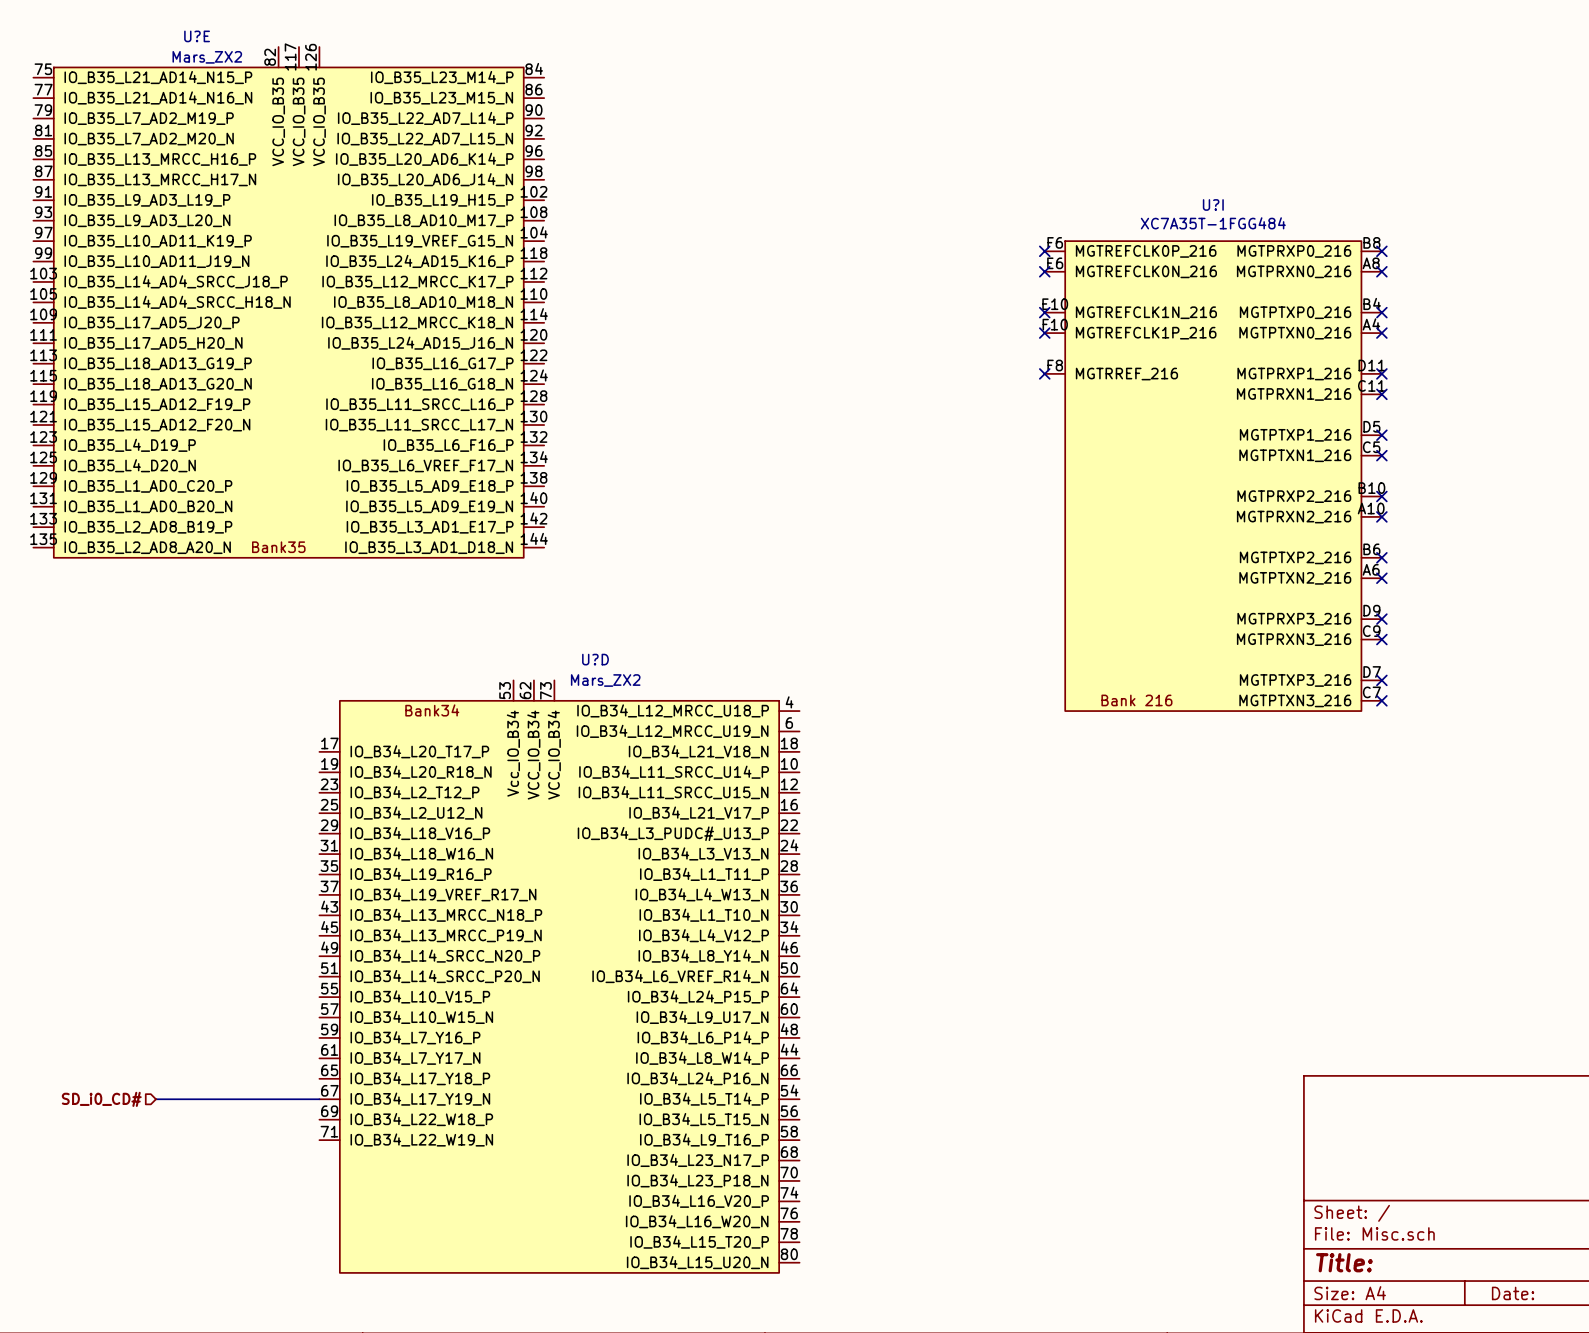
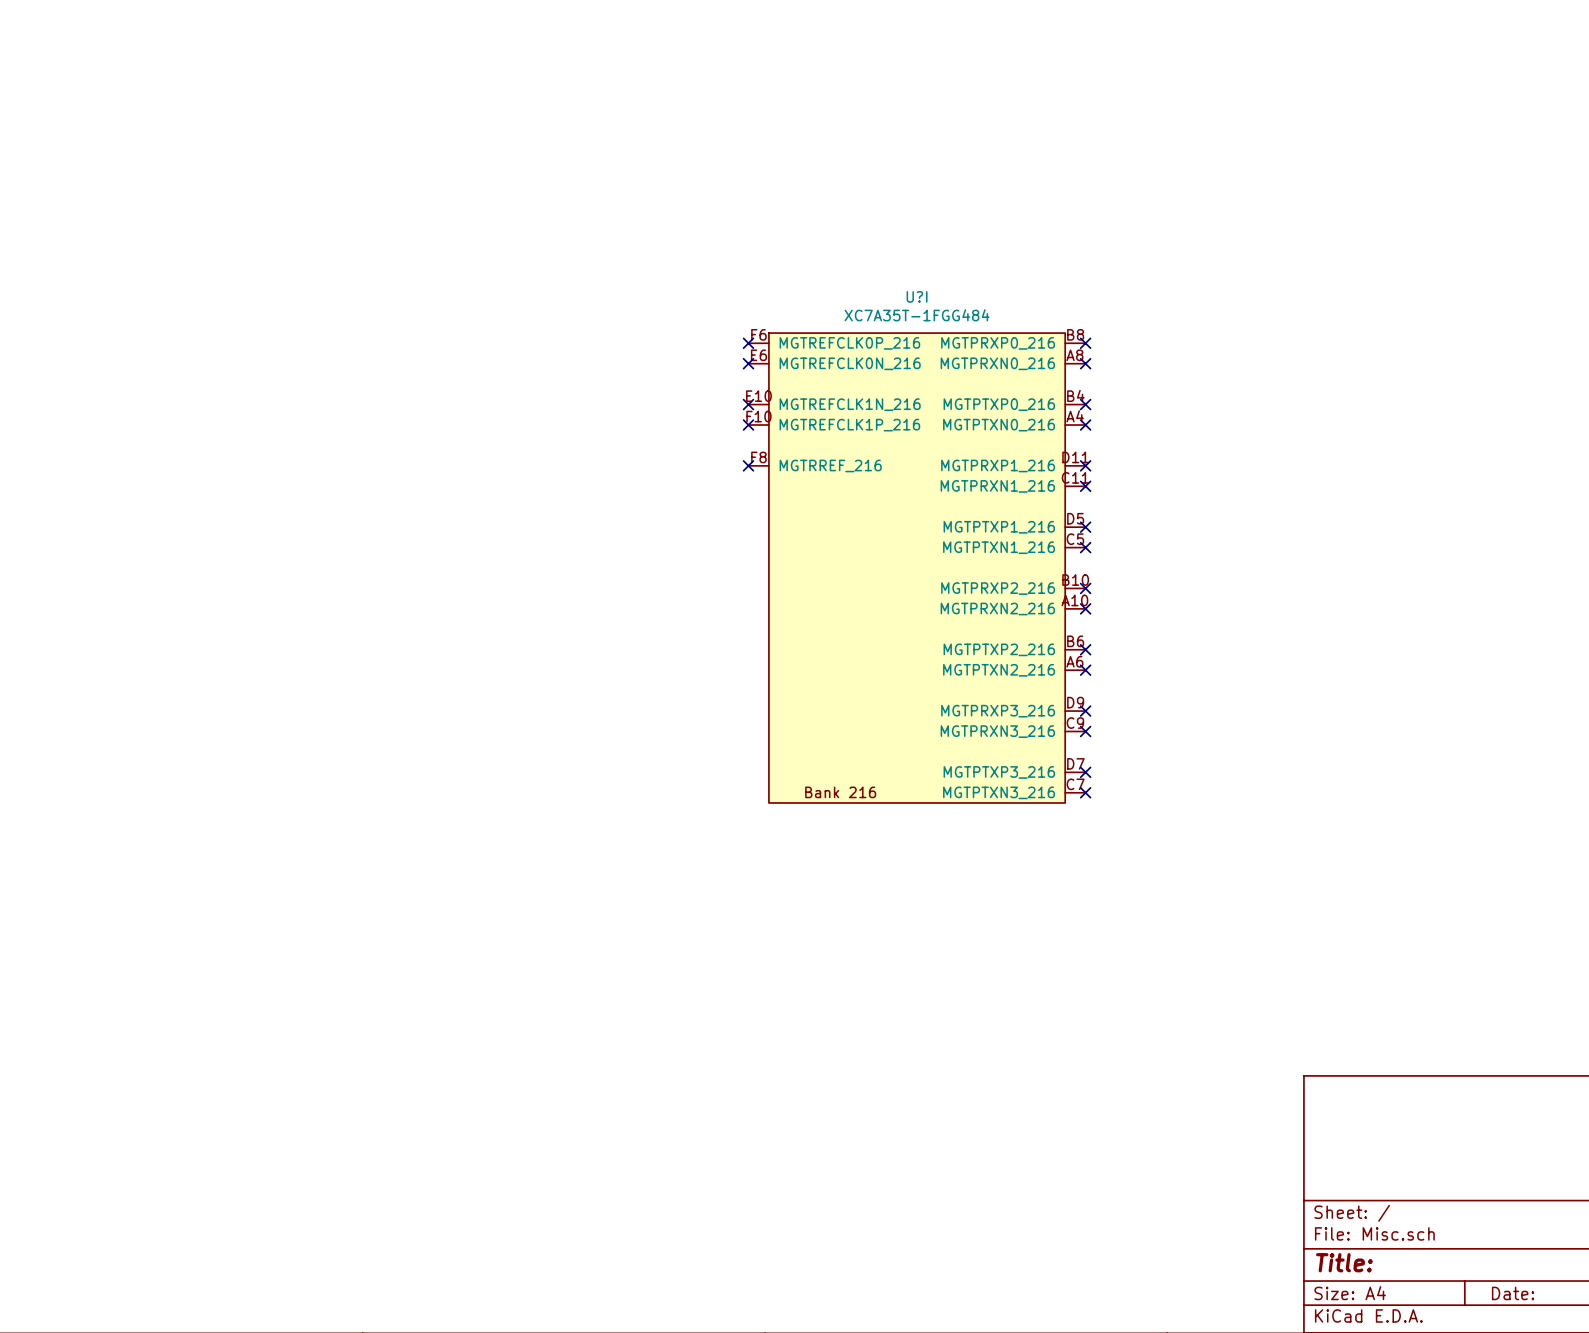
no-connect mark: (1044, 251) -> none
no-connect mark: (1381, 251) -> none
no-connect mark: (1044, 271) -> none
no-connect mark: (1381, 271) -> none
U?E: Mars_ZX2 (288, 302) -> none
no-connect mark: (1044, 312) -> none
no-connect mark: (1381, 312) -> none
no-connect mark: (1044, 333) -> none
no-connect mark: (1381, 333) -> none
no-connect mark: none -> (748, 343)
no-connect mark: none -> (1085, 343)
no-connect mark: none -> (748, 363)
no-connect mark: none -> (1085, 363)
no-connect mark: (1044, 373) -> none
no-connect mark: (1381, 373) -> none
no-connect mark: (1381, 394) -> none
no-connect mark: none -> (748, 404)
no-connect mark: none -> (1085, 404)
no-connect mark: none -> (748, 425)
no-connect mark: none -> (1085, 425)
no-connect mark: (1381, 435) -> none
no-connect mark: (1381, 455) -> none
no-connect mark: none -> (748, 465)
no-connect mark: none -> (1085, 465)
U?I: XC7A35T-1FGG484 (1213, 476) -> none
no-connect mark: none -> (1085, 486)
no-connect mark: (1381, 496) -> none
no-connect mark: (1381, 516) -> none
no-connect mark: none -> (1085, 527)
no-connect mark: none -> (1085, 547)
no-connect mark: (1381, 557) -> none
U?I: none -> XC7A35T-1FGG484 (917, 568)
no-connect mark: (1381, 578) -> none
no-connect mark: none -> (1085, 588)
no-connect mark: none -> (1085, 608)
no-connect mark: (1381, 619) -> none
no-connect mark: (1381, 639) -> none
no-connect mark: none -> (1085, 649)
no-connect mark: none -> (1085, 670)
no-connect mark: (1381, 680) -> none
no-connect mark: (1381, 700) -> none
no-connect mark: none -> (1085, 711)
no-connect mark: none -> (1085, 731)
no-connect mark: none -> (1085, 772)
no-connect mark: none -> (1085, 792)
U?D: Mars_ZX2 (559, 976) -> none
hierarchical label: SD_i0_CD# (101, 1099) -> none
wire: (155, 1099) (319, 1099) -> none

